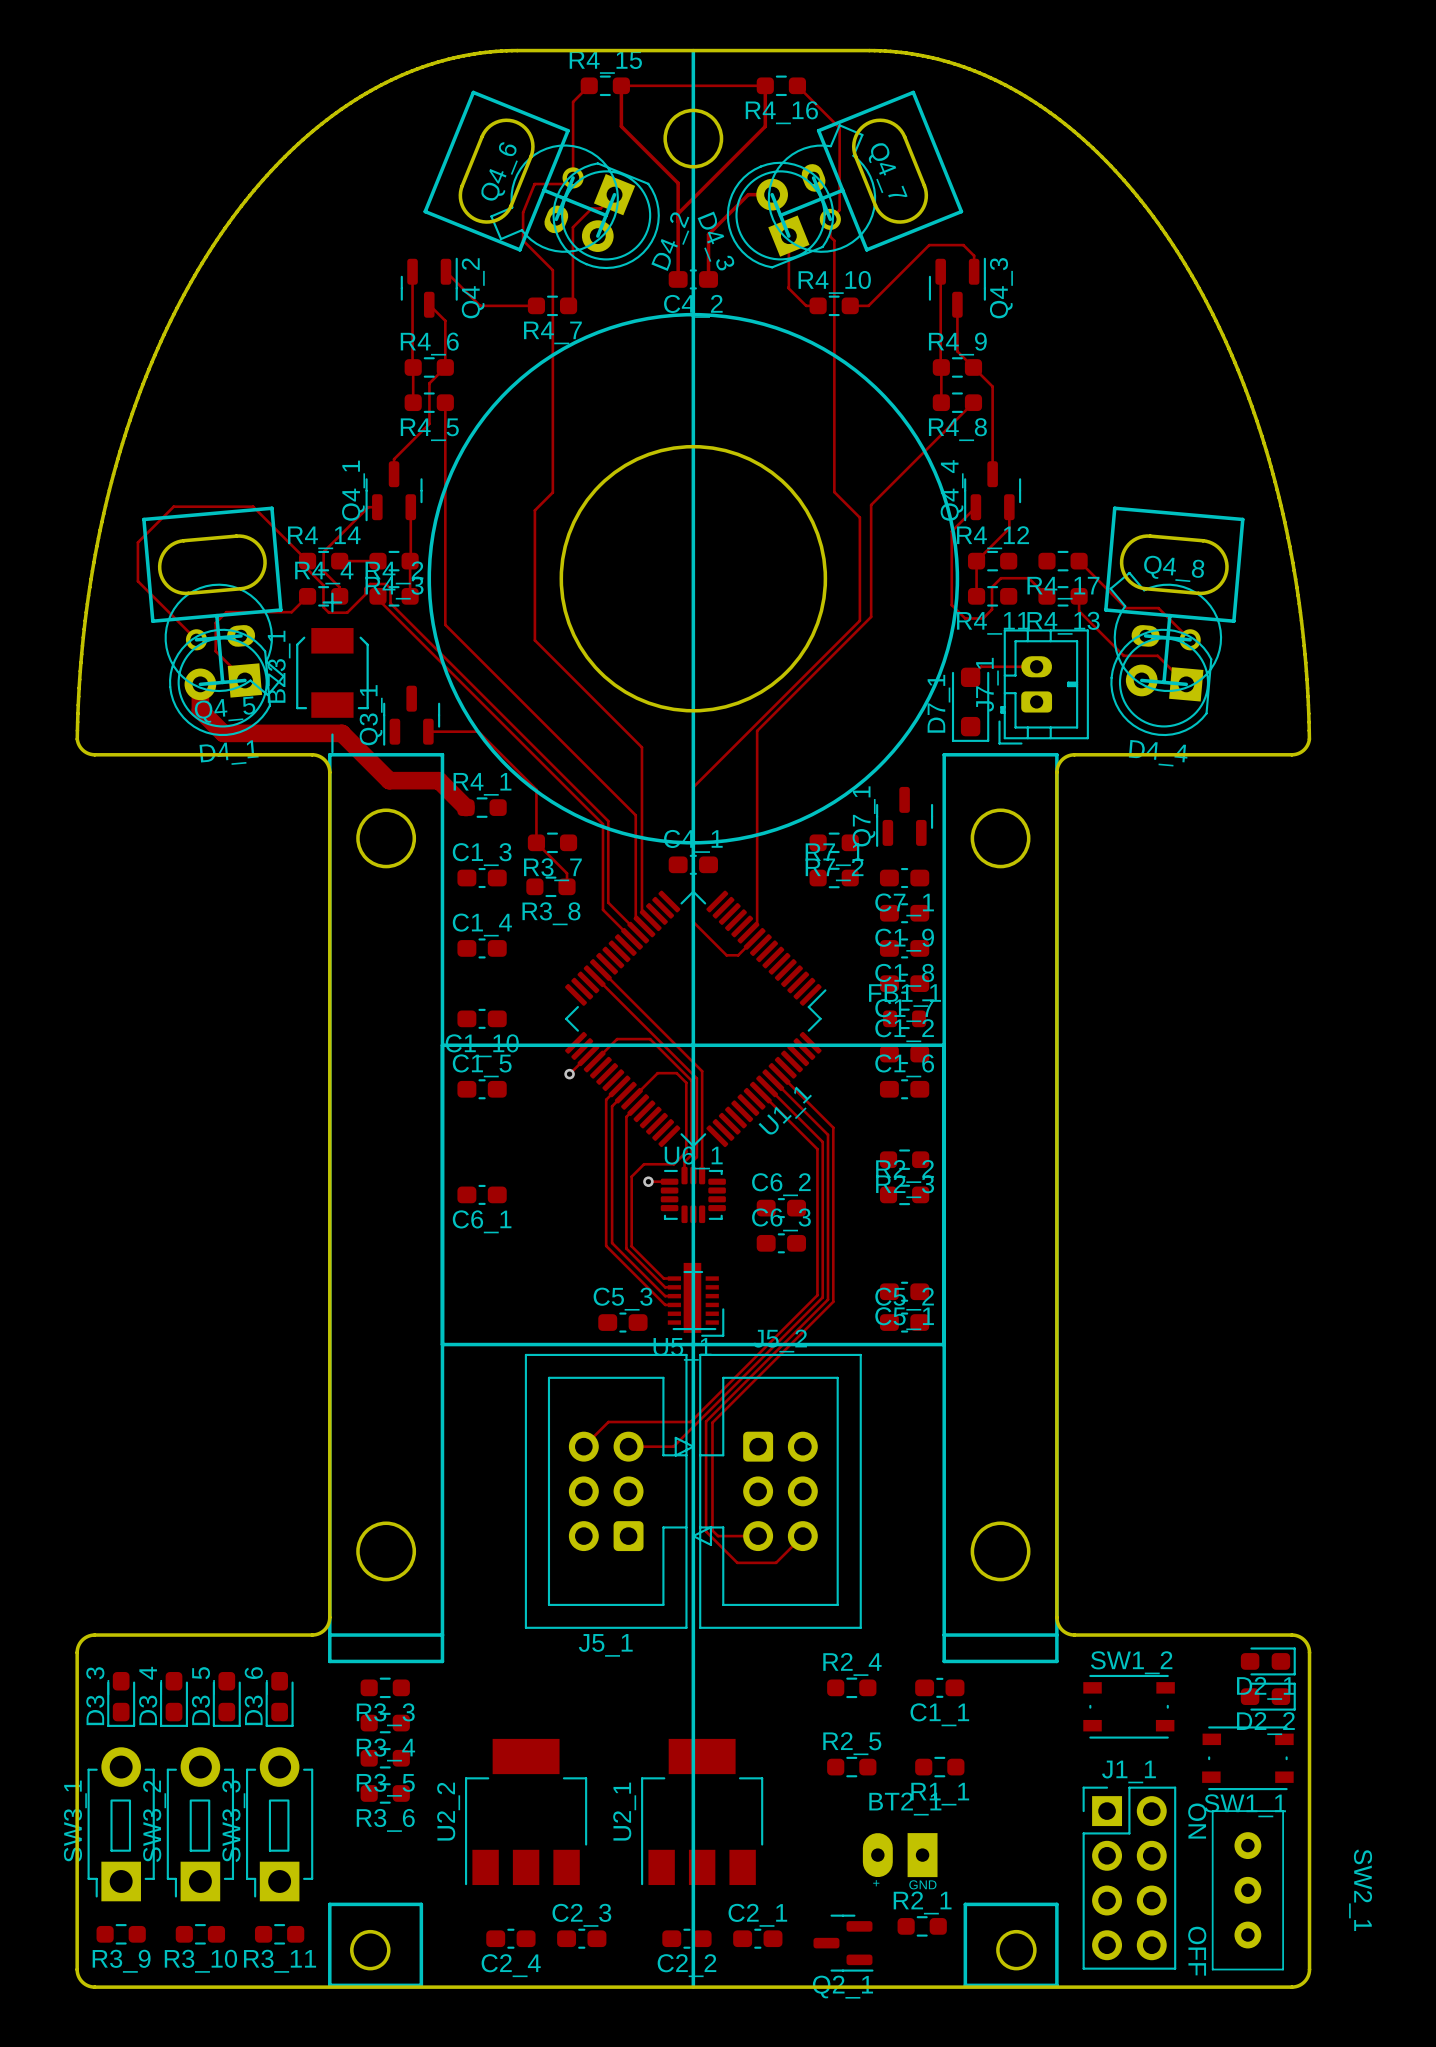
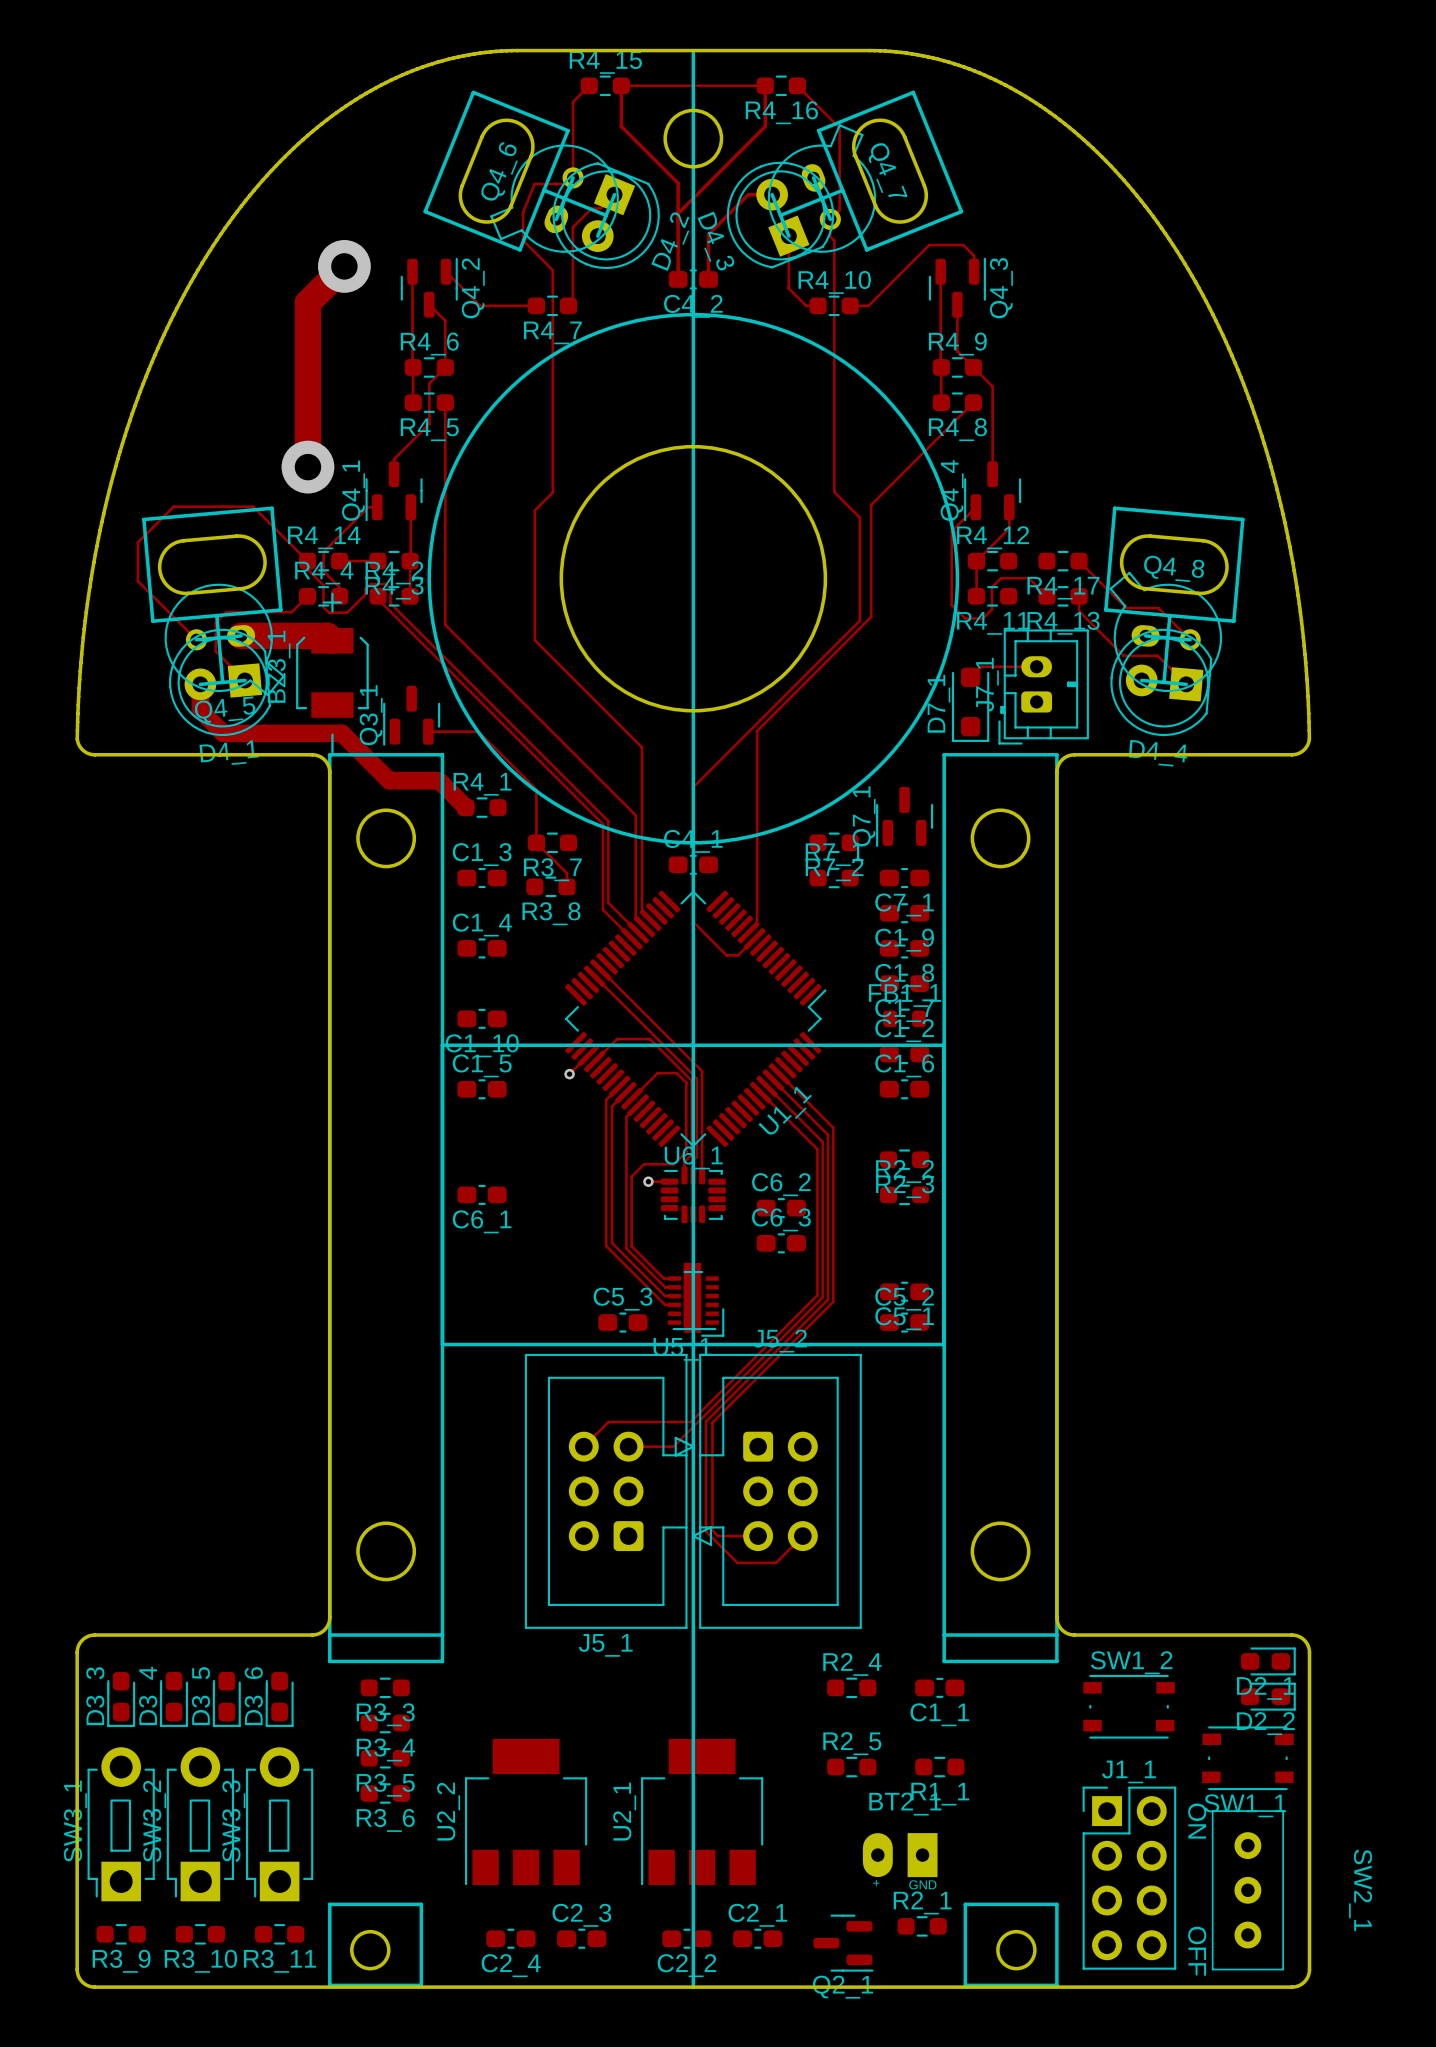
track: none -> (344, 266) (307, 302) (307, 467)
via: none -> (344, 266)
via: none -> (307, 467)
track: none -> (241, 635) (327, 635) (332, 640)

